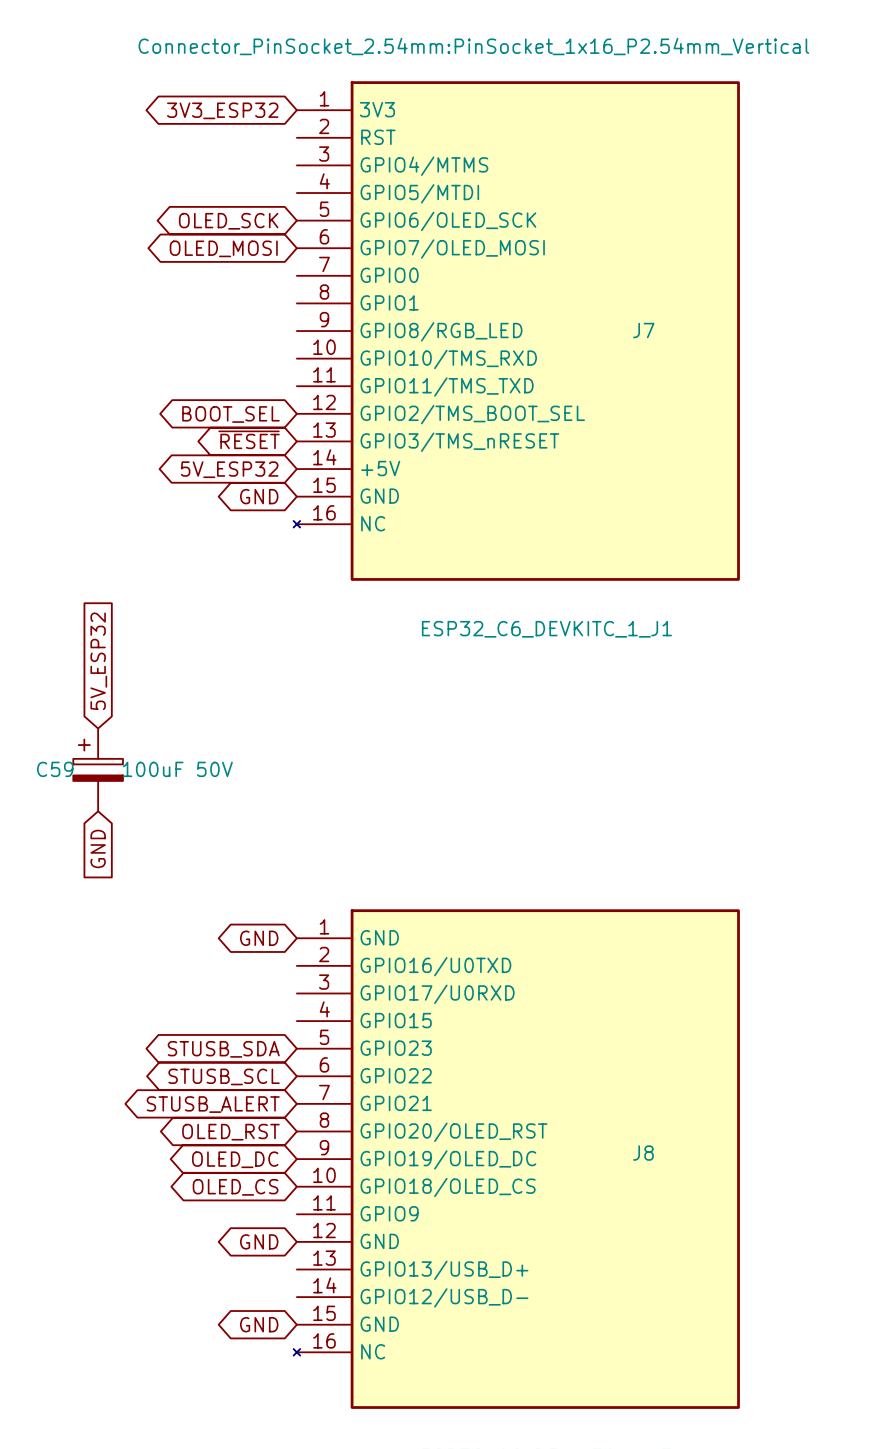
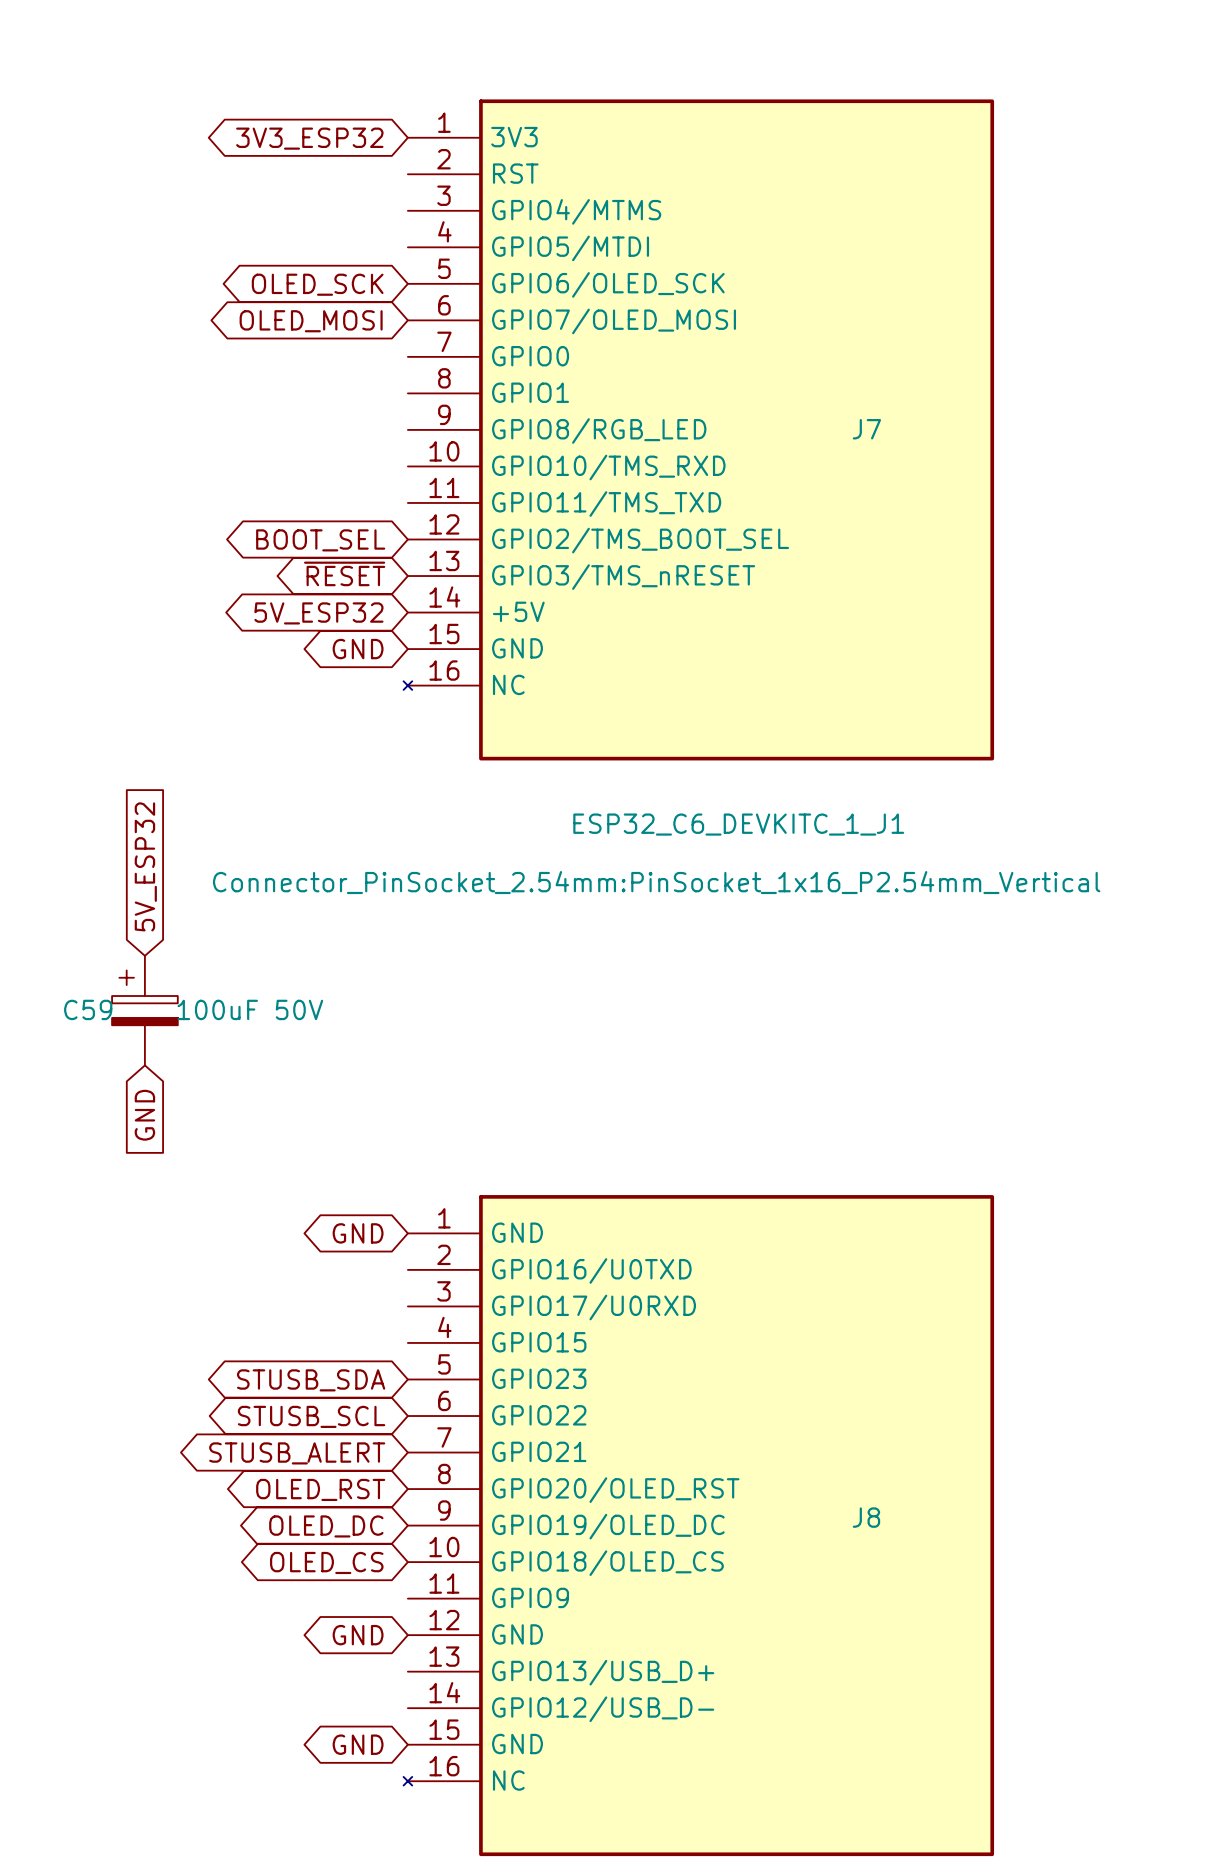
J7 text position: Connector_PinSocket_2.54mm:PinSocket_1x16_P2.54mm_Vertical (473, 46) -> Connector_PinSocket_2.54mm:PinSocket_1x16_P2.54mm_Vertical (656, 882)

